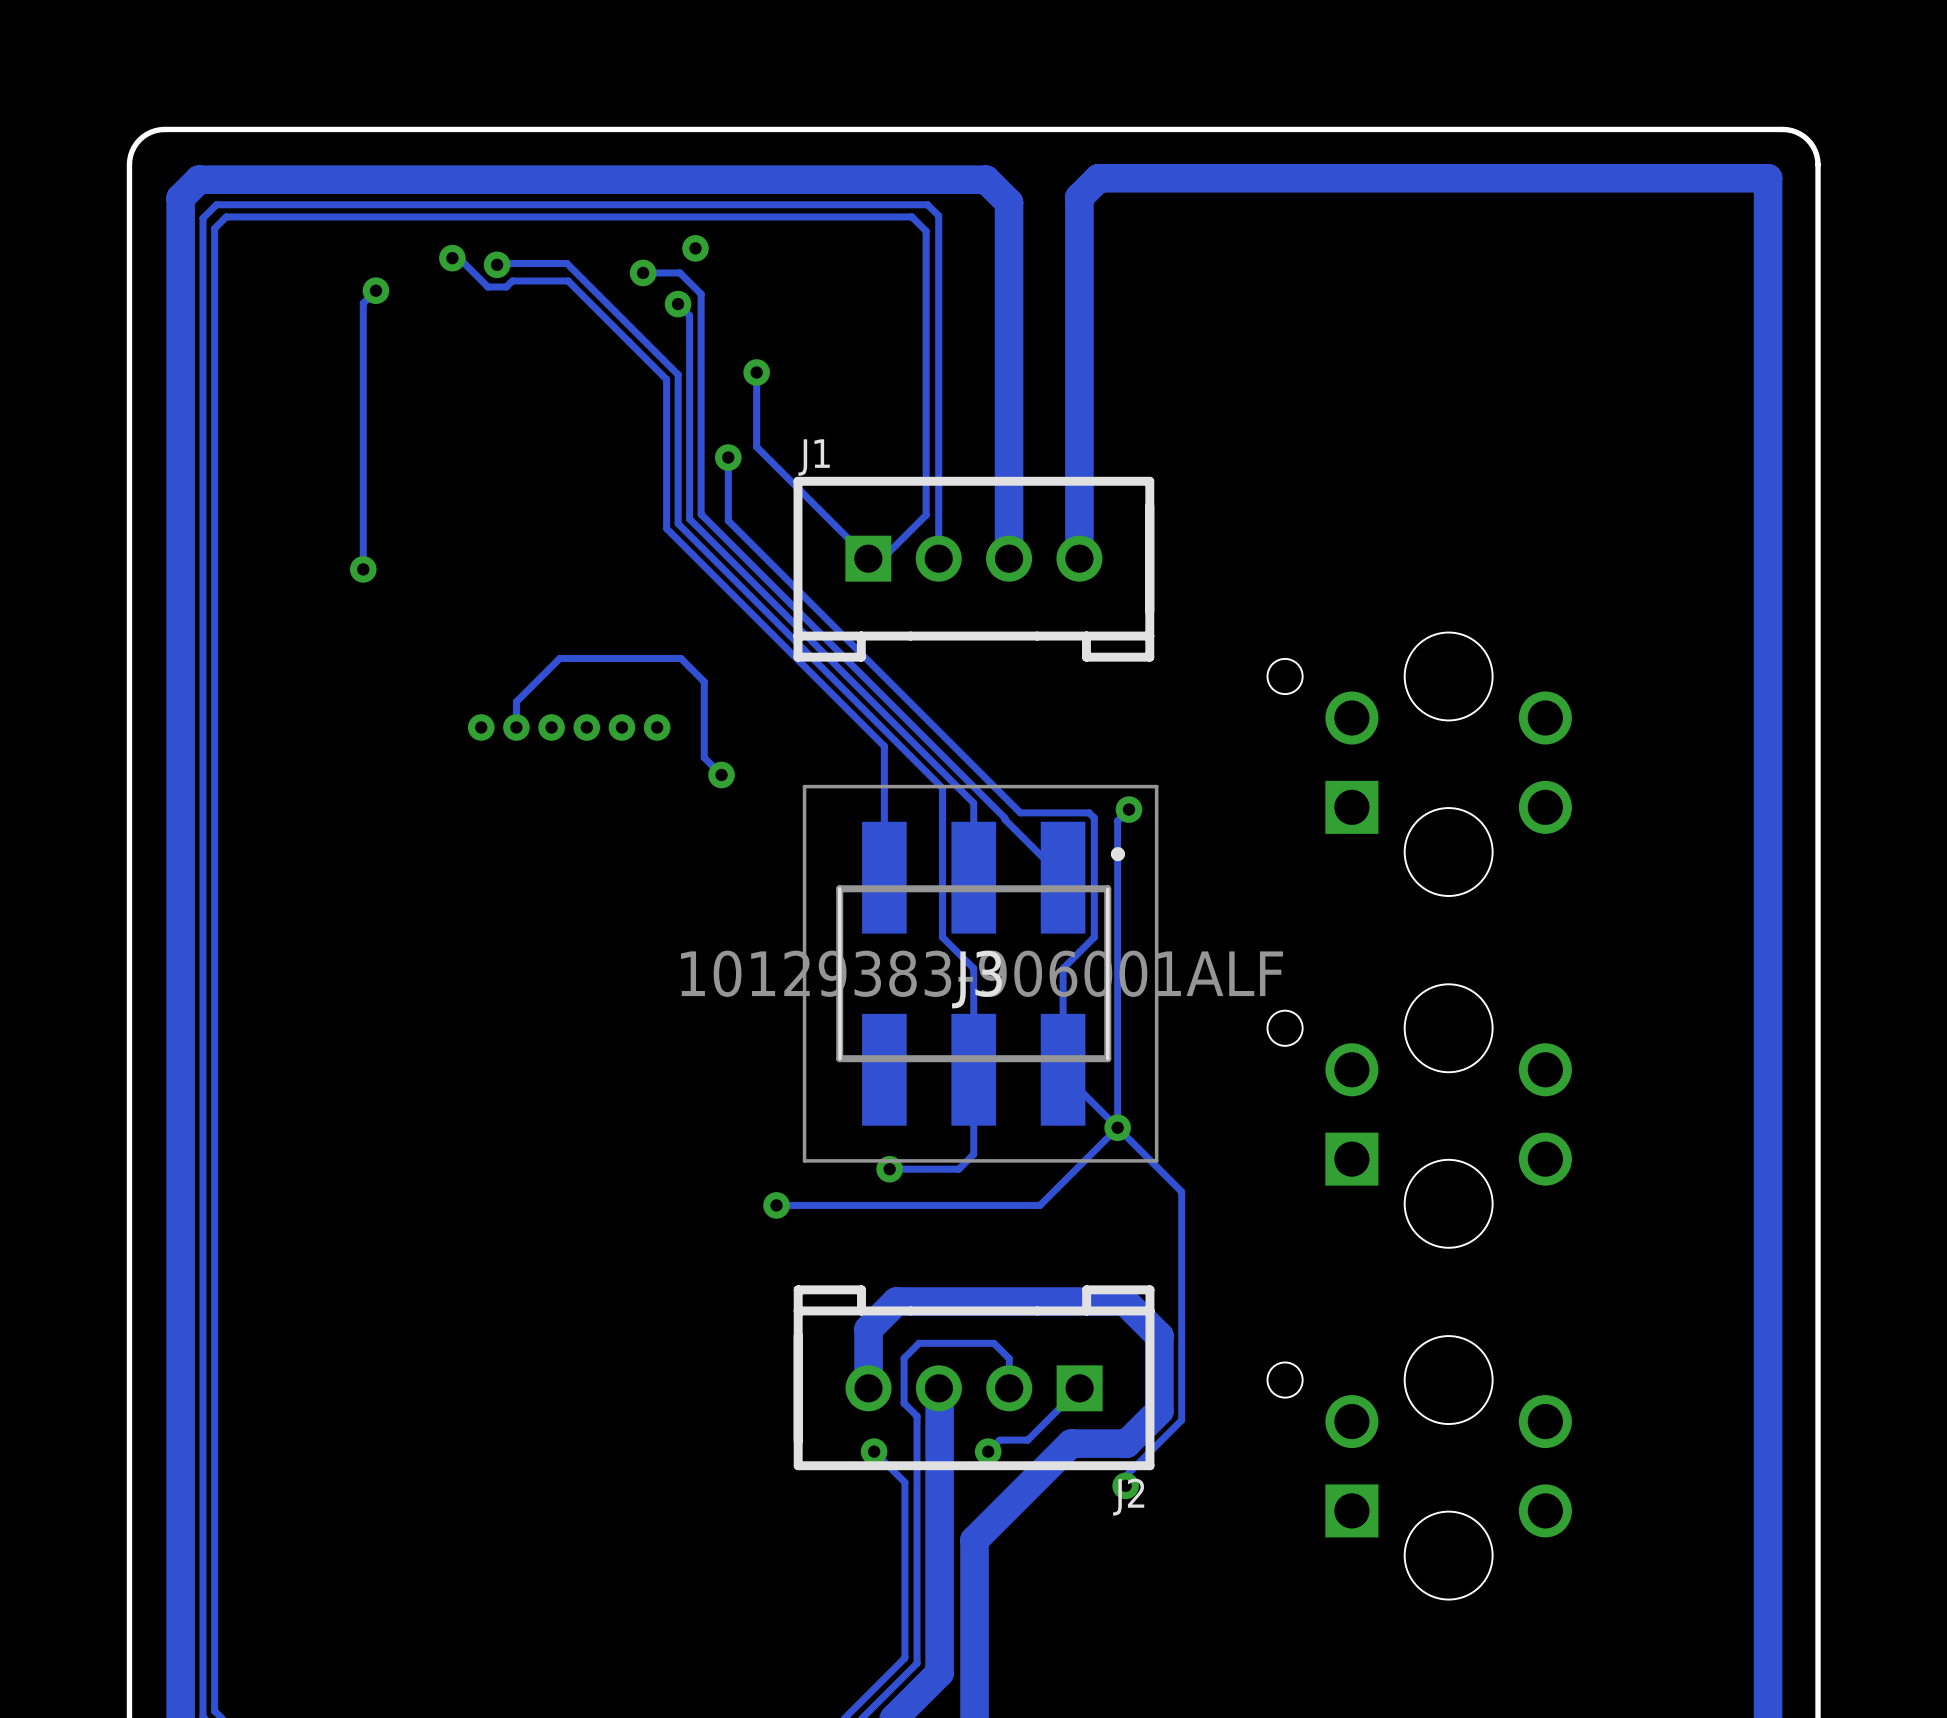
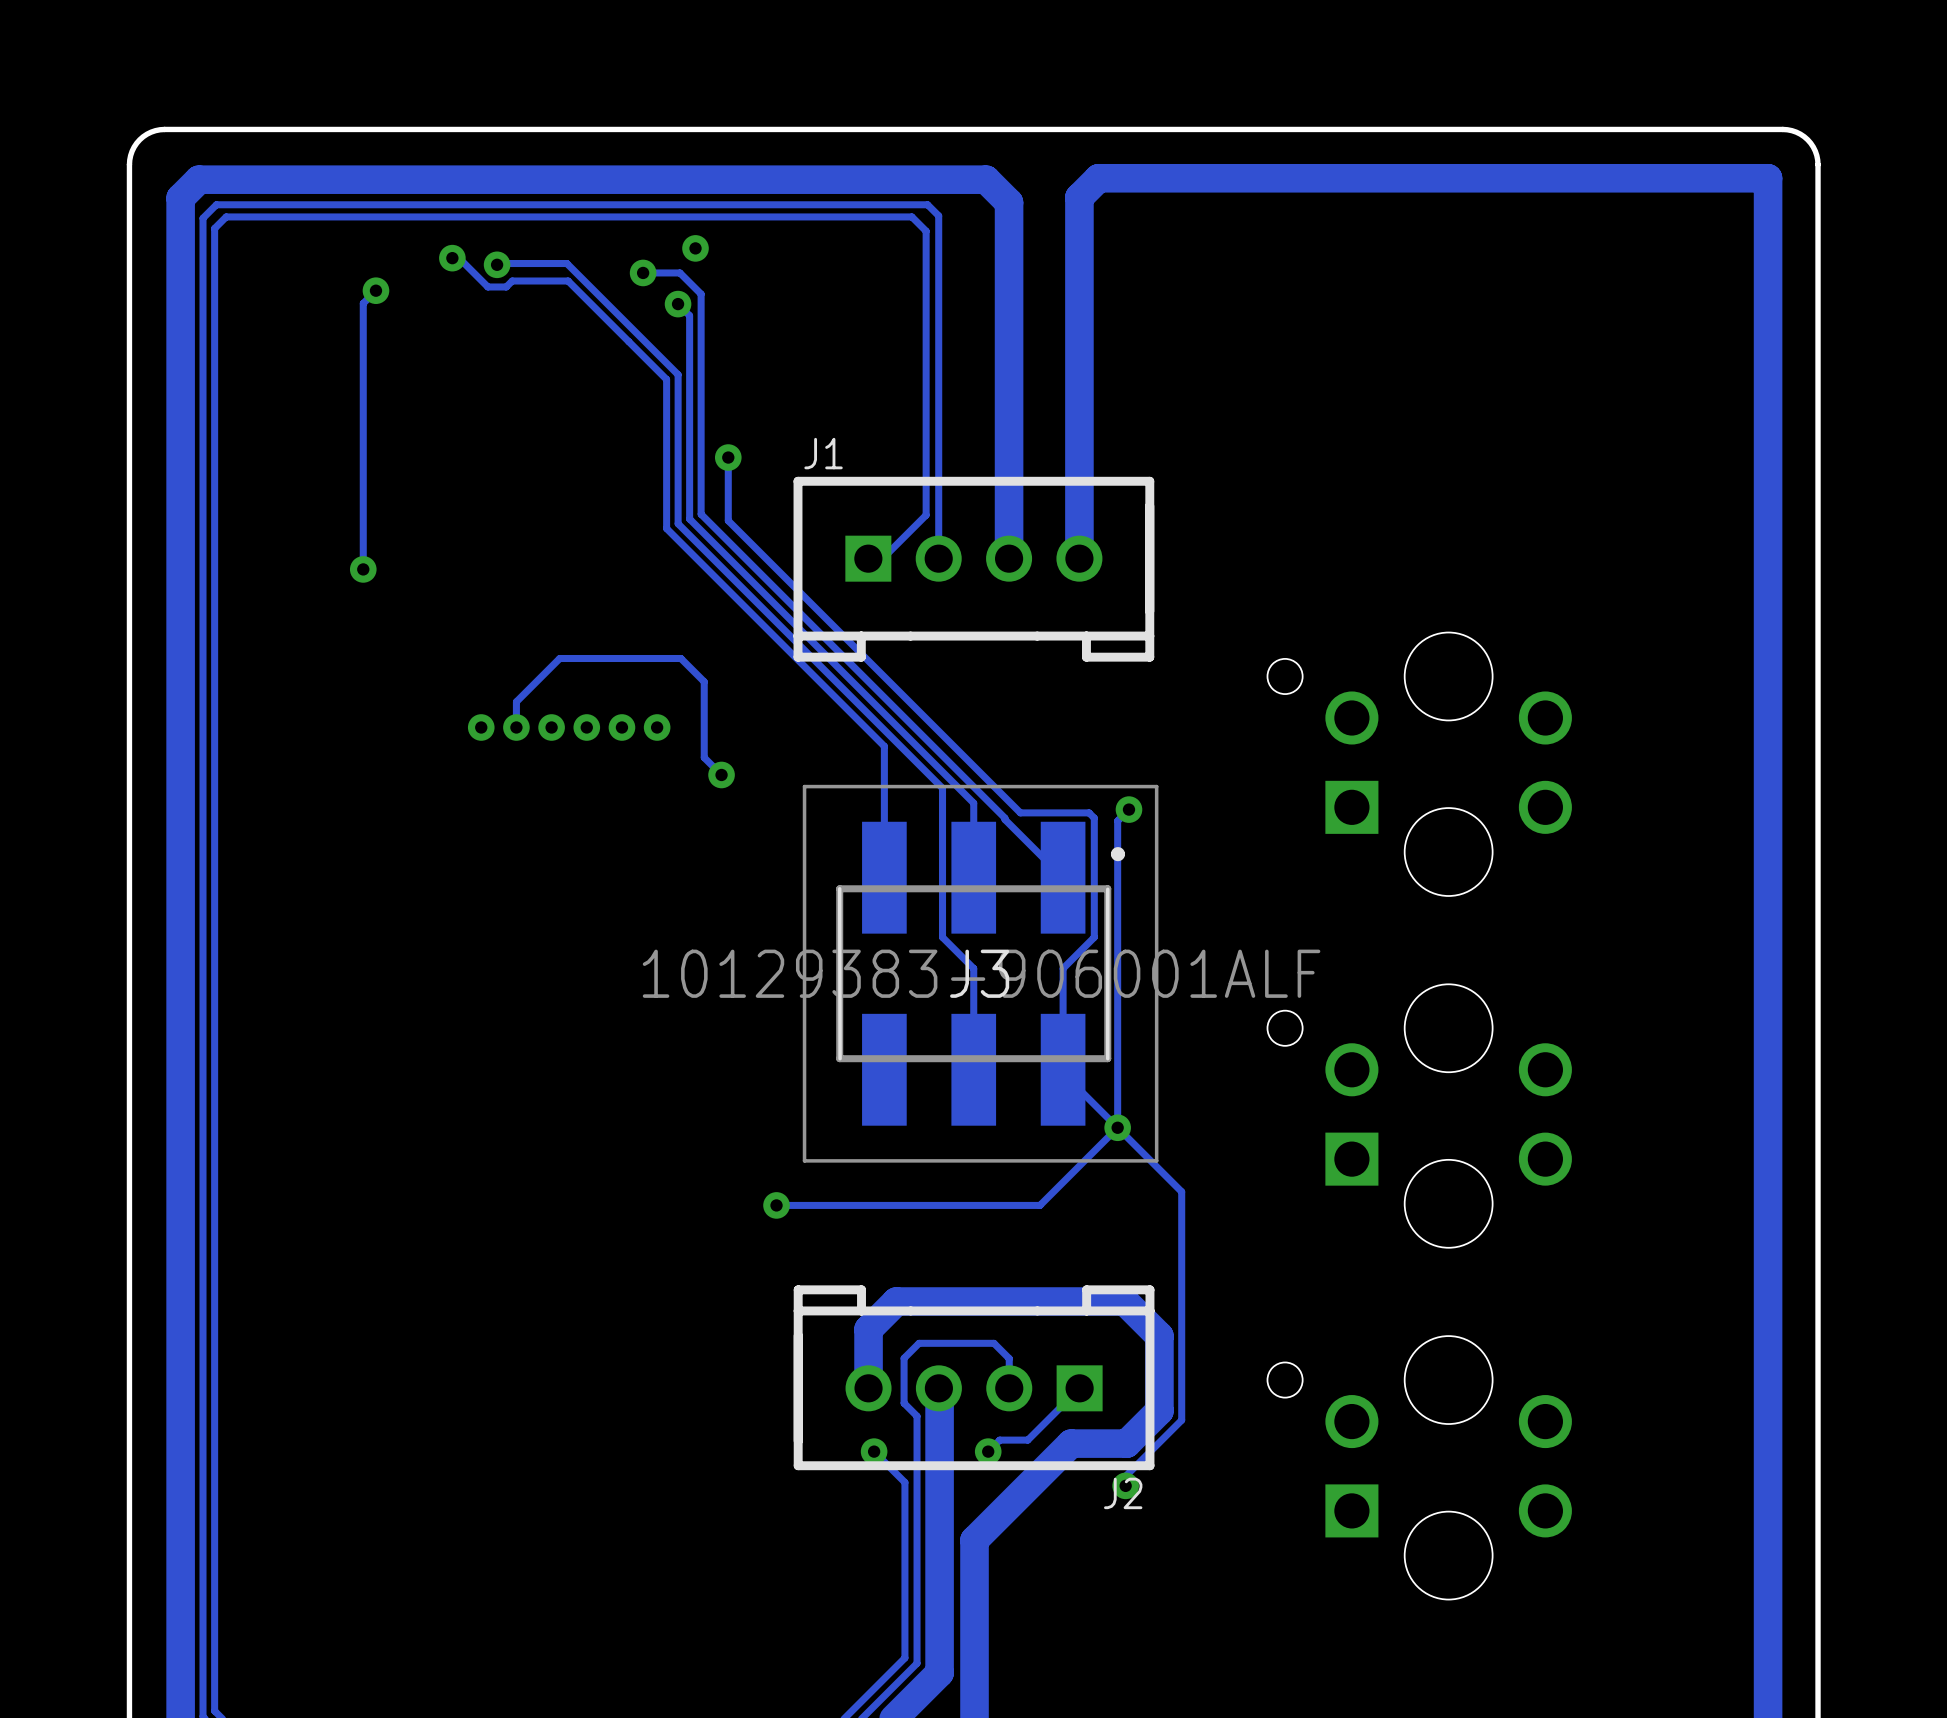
track: (756, 372) (756, 446) (868, 558) -> none
via: (756, 372) -> none
track: (973, 1069) (973, 1154) (958, 1169) (889, 1169) -> none
via: (889, 1169) -> none

